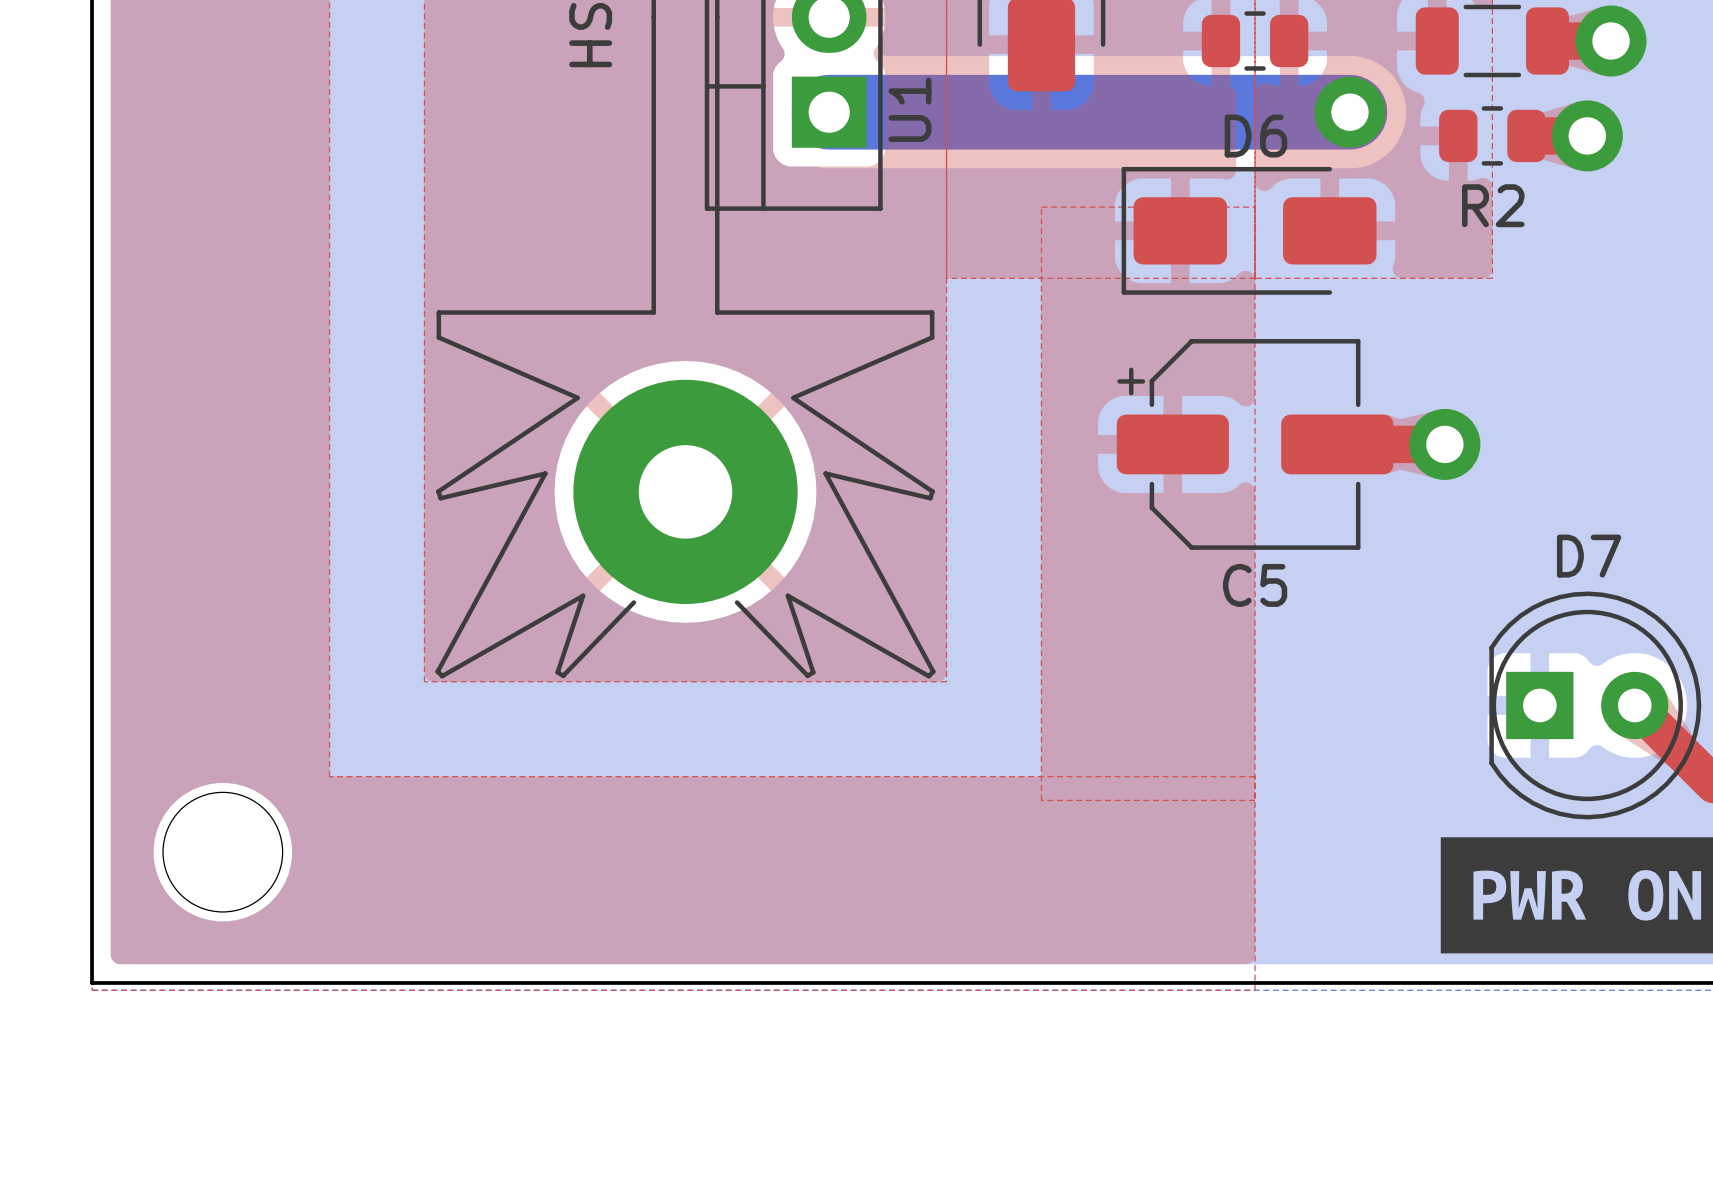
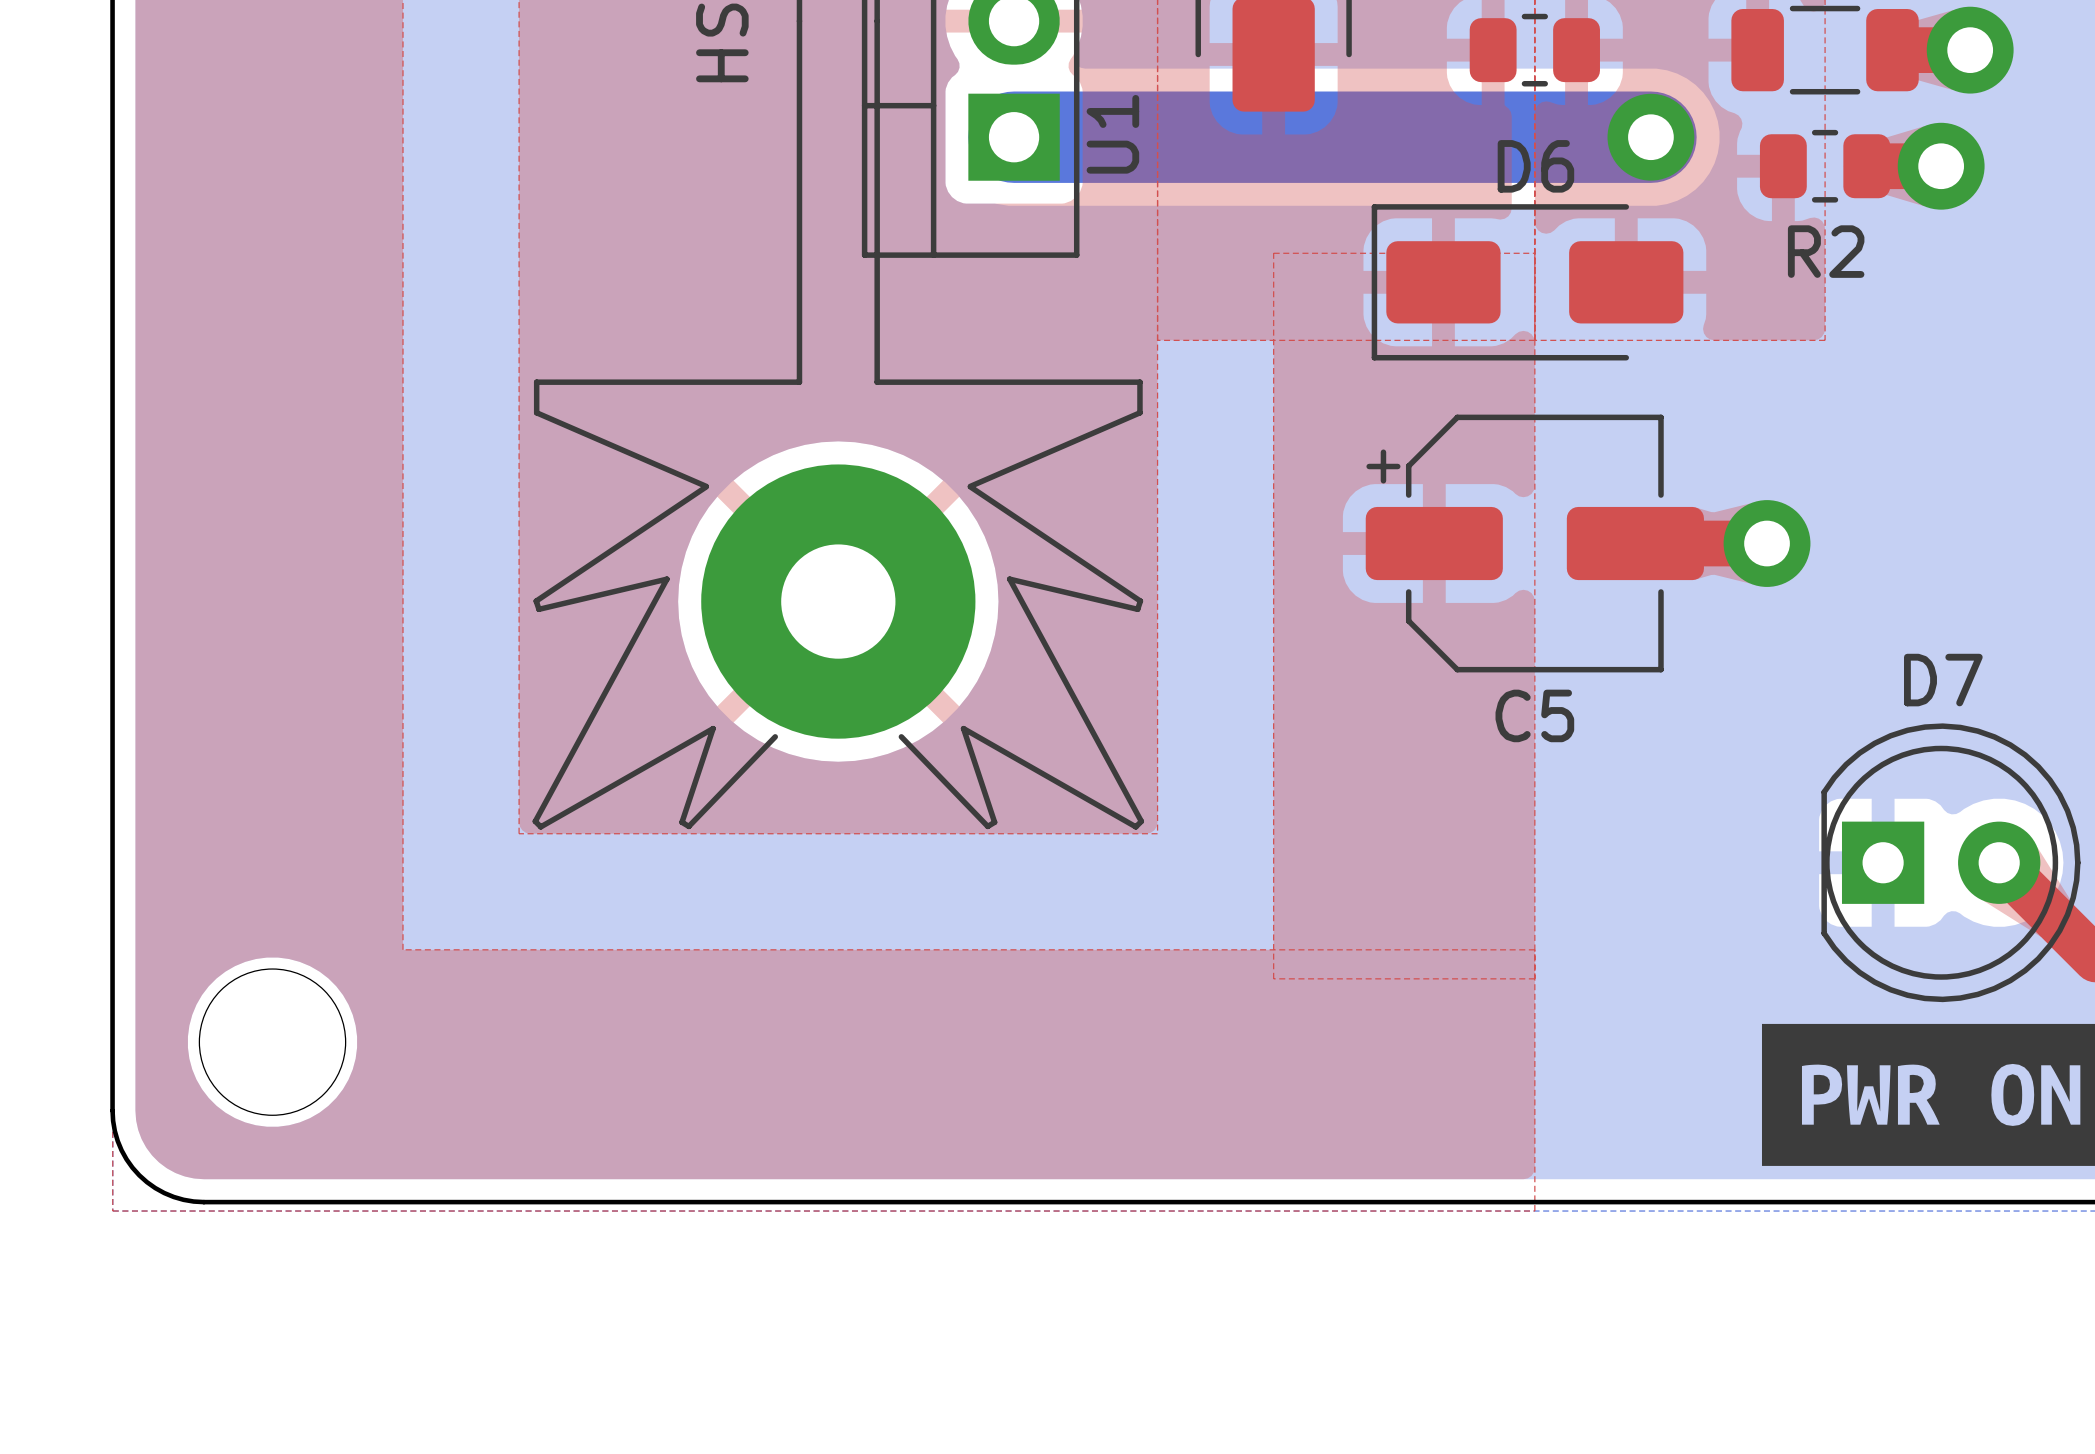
board edge: (92, 908) (92, 982) (166, 982) -> (112, 1110) (114, 1131) (121, 1150) (139, 1175) (164, 1193) (183, 1199) (203, 1202)

